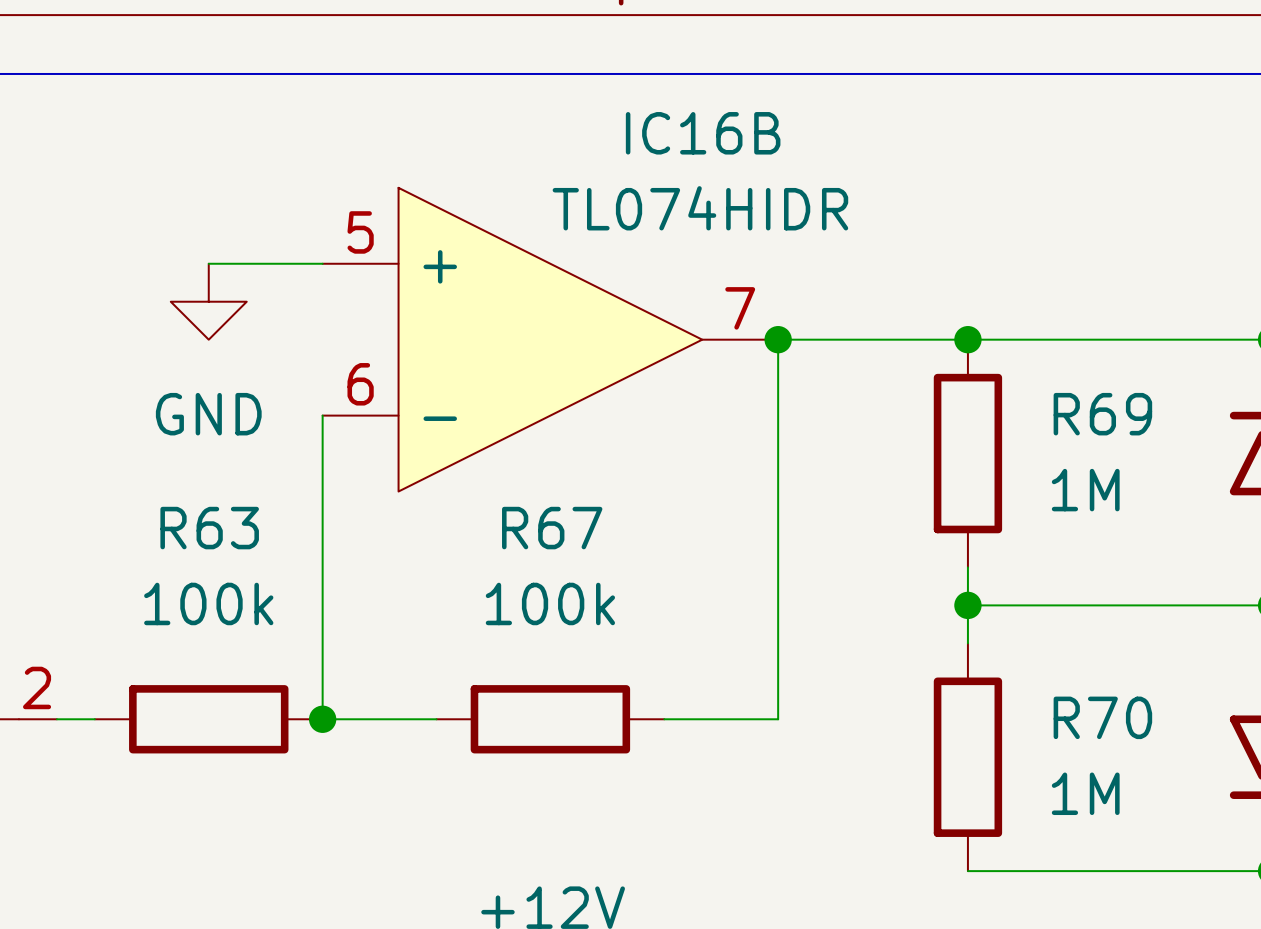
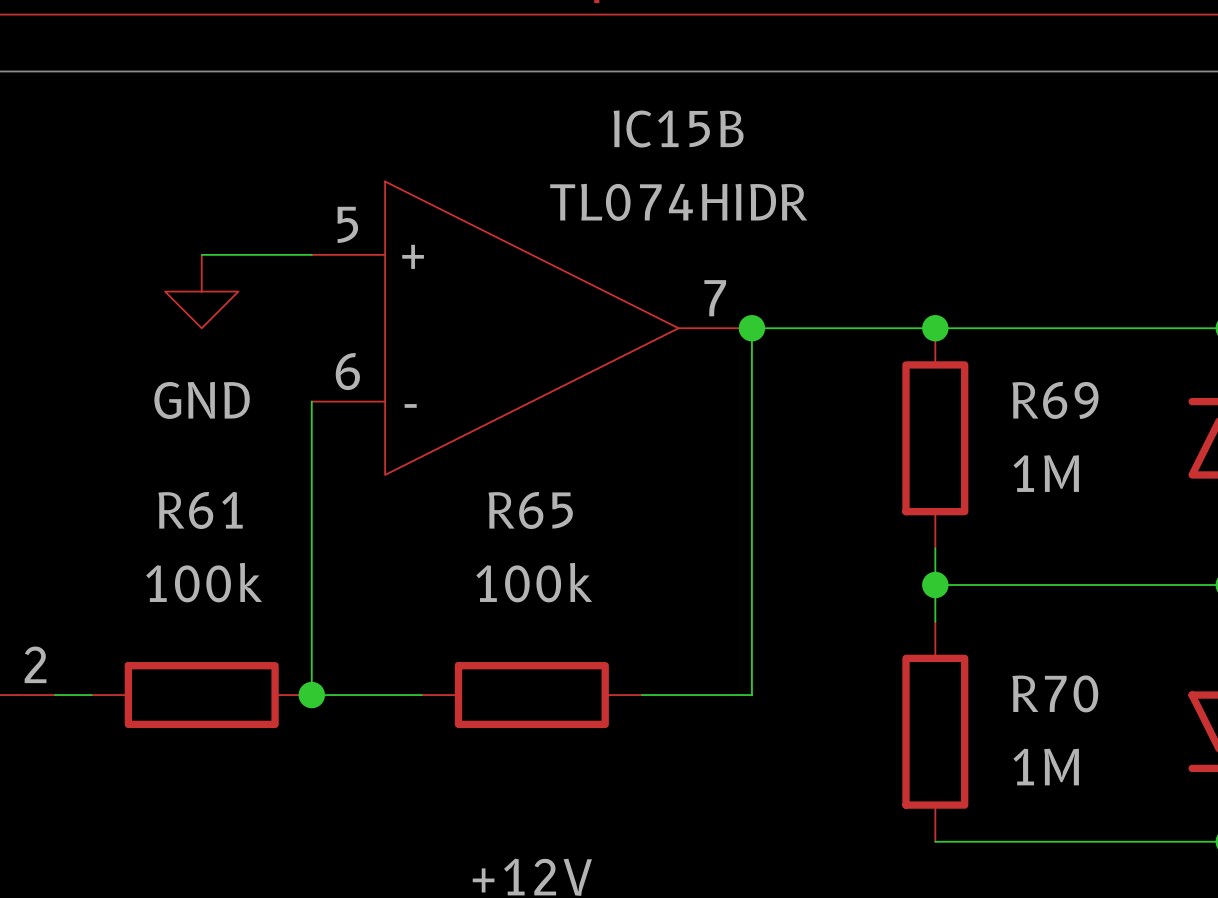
IC16B name: IC16B (703, 133) -> IC15B (678, 129)
R63 name: R63 (209, 528) -> R61 (200, 510)
R67 name: R67 (552, 528) -> R65 (530, 510)

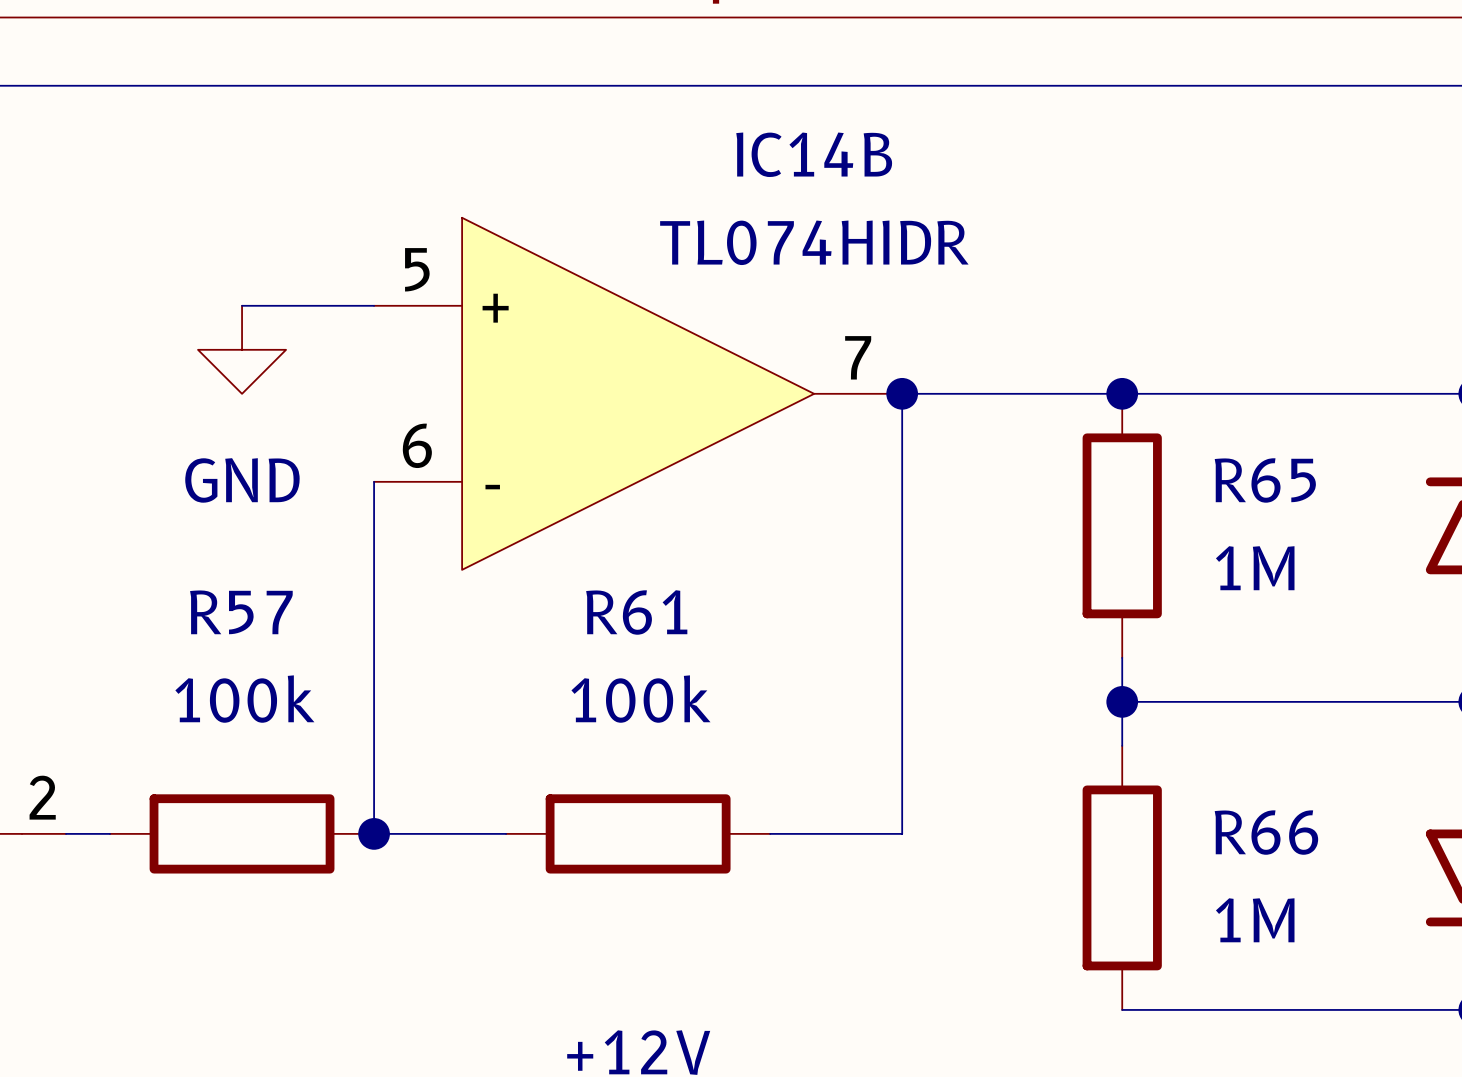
IC15B name: IC15B (678, 129) -> IC14B (814, 154)
R69 name: R69 (1055, 400) -> R65 (1265, 480)
R61 name: R61 (200, 510) -> R57 (241, 612)
R65 name: R65 (530, 510) -> R61 (636, 612)
R70 name: R70 (1055, 693) -> R66 (1266, 832)

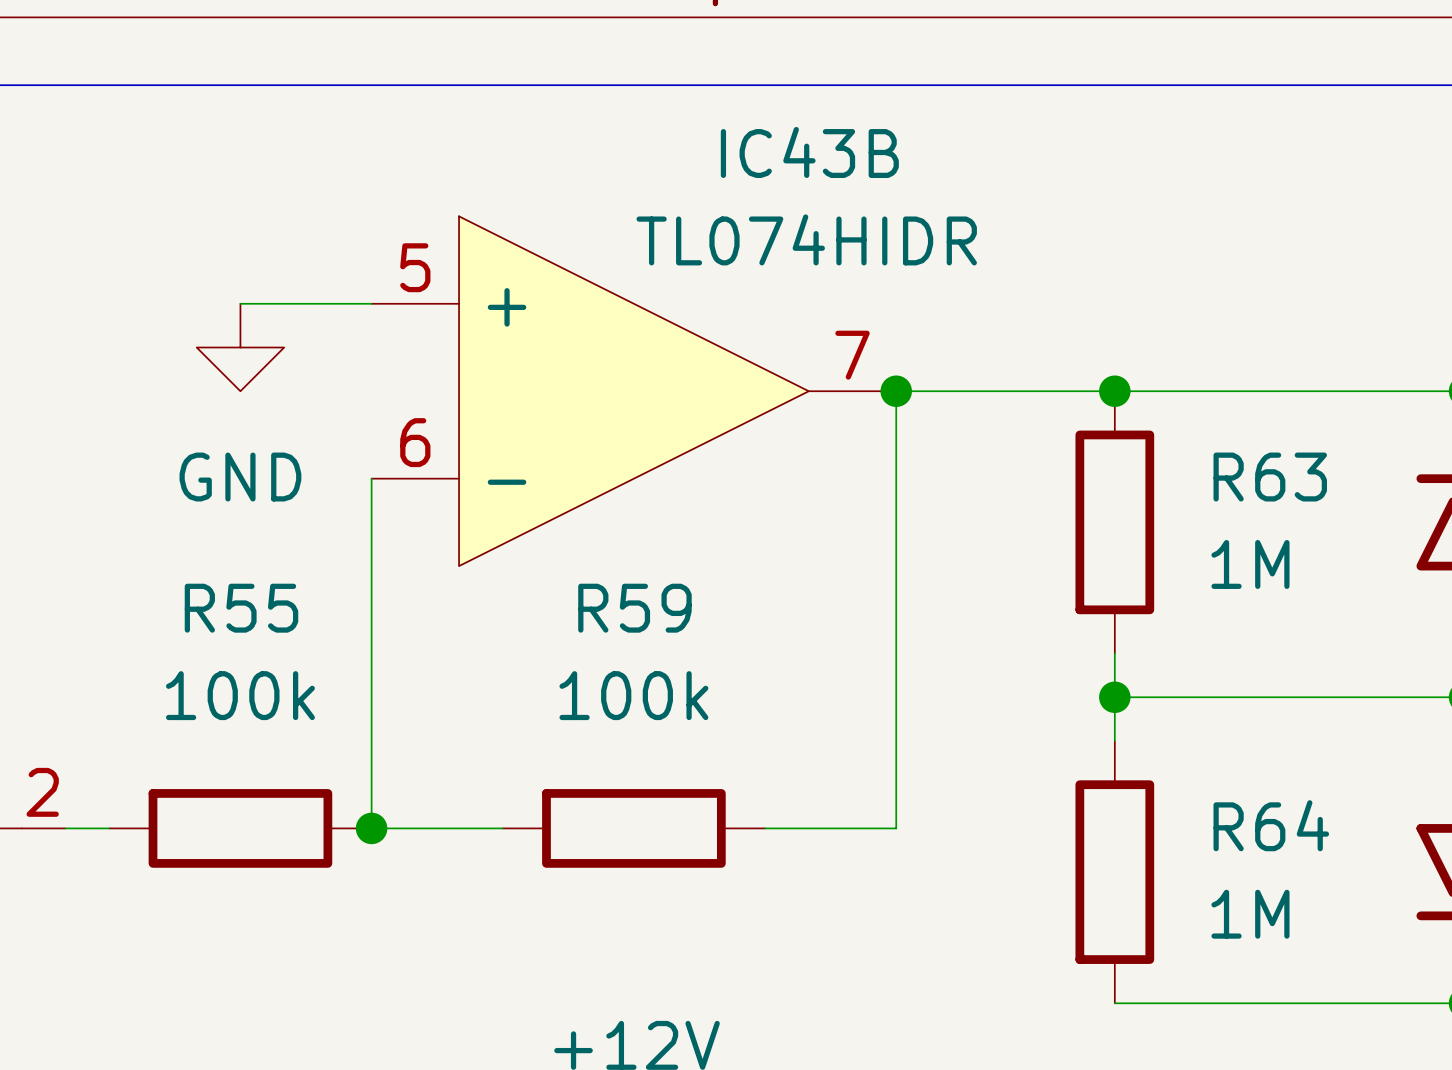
IC14B name: IC14B (814, 154) -> IC43B (809, 152)
R65 name: R65 (1265, 480) -> R63 (1270, 477)
R57 name: R57 (241, 612) -> R55 (241, 608)
R61 name: R61 (636, 612) -> R59 (634, 608)
R66 name: R66 (1266, 832) -> R64 (1271, 825)

